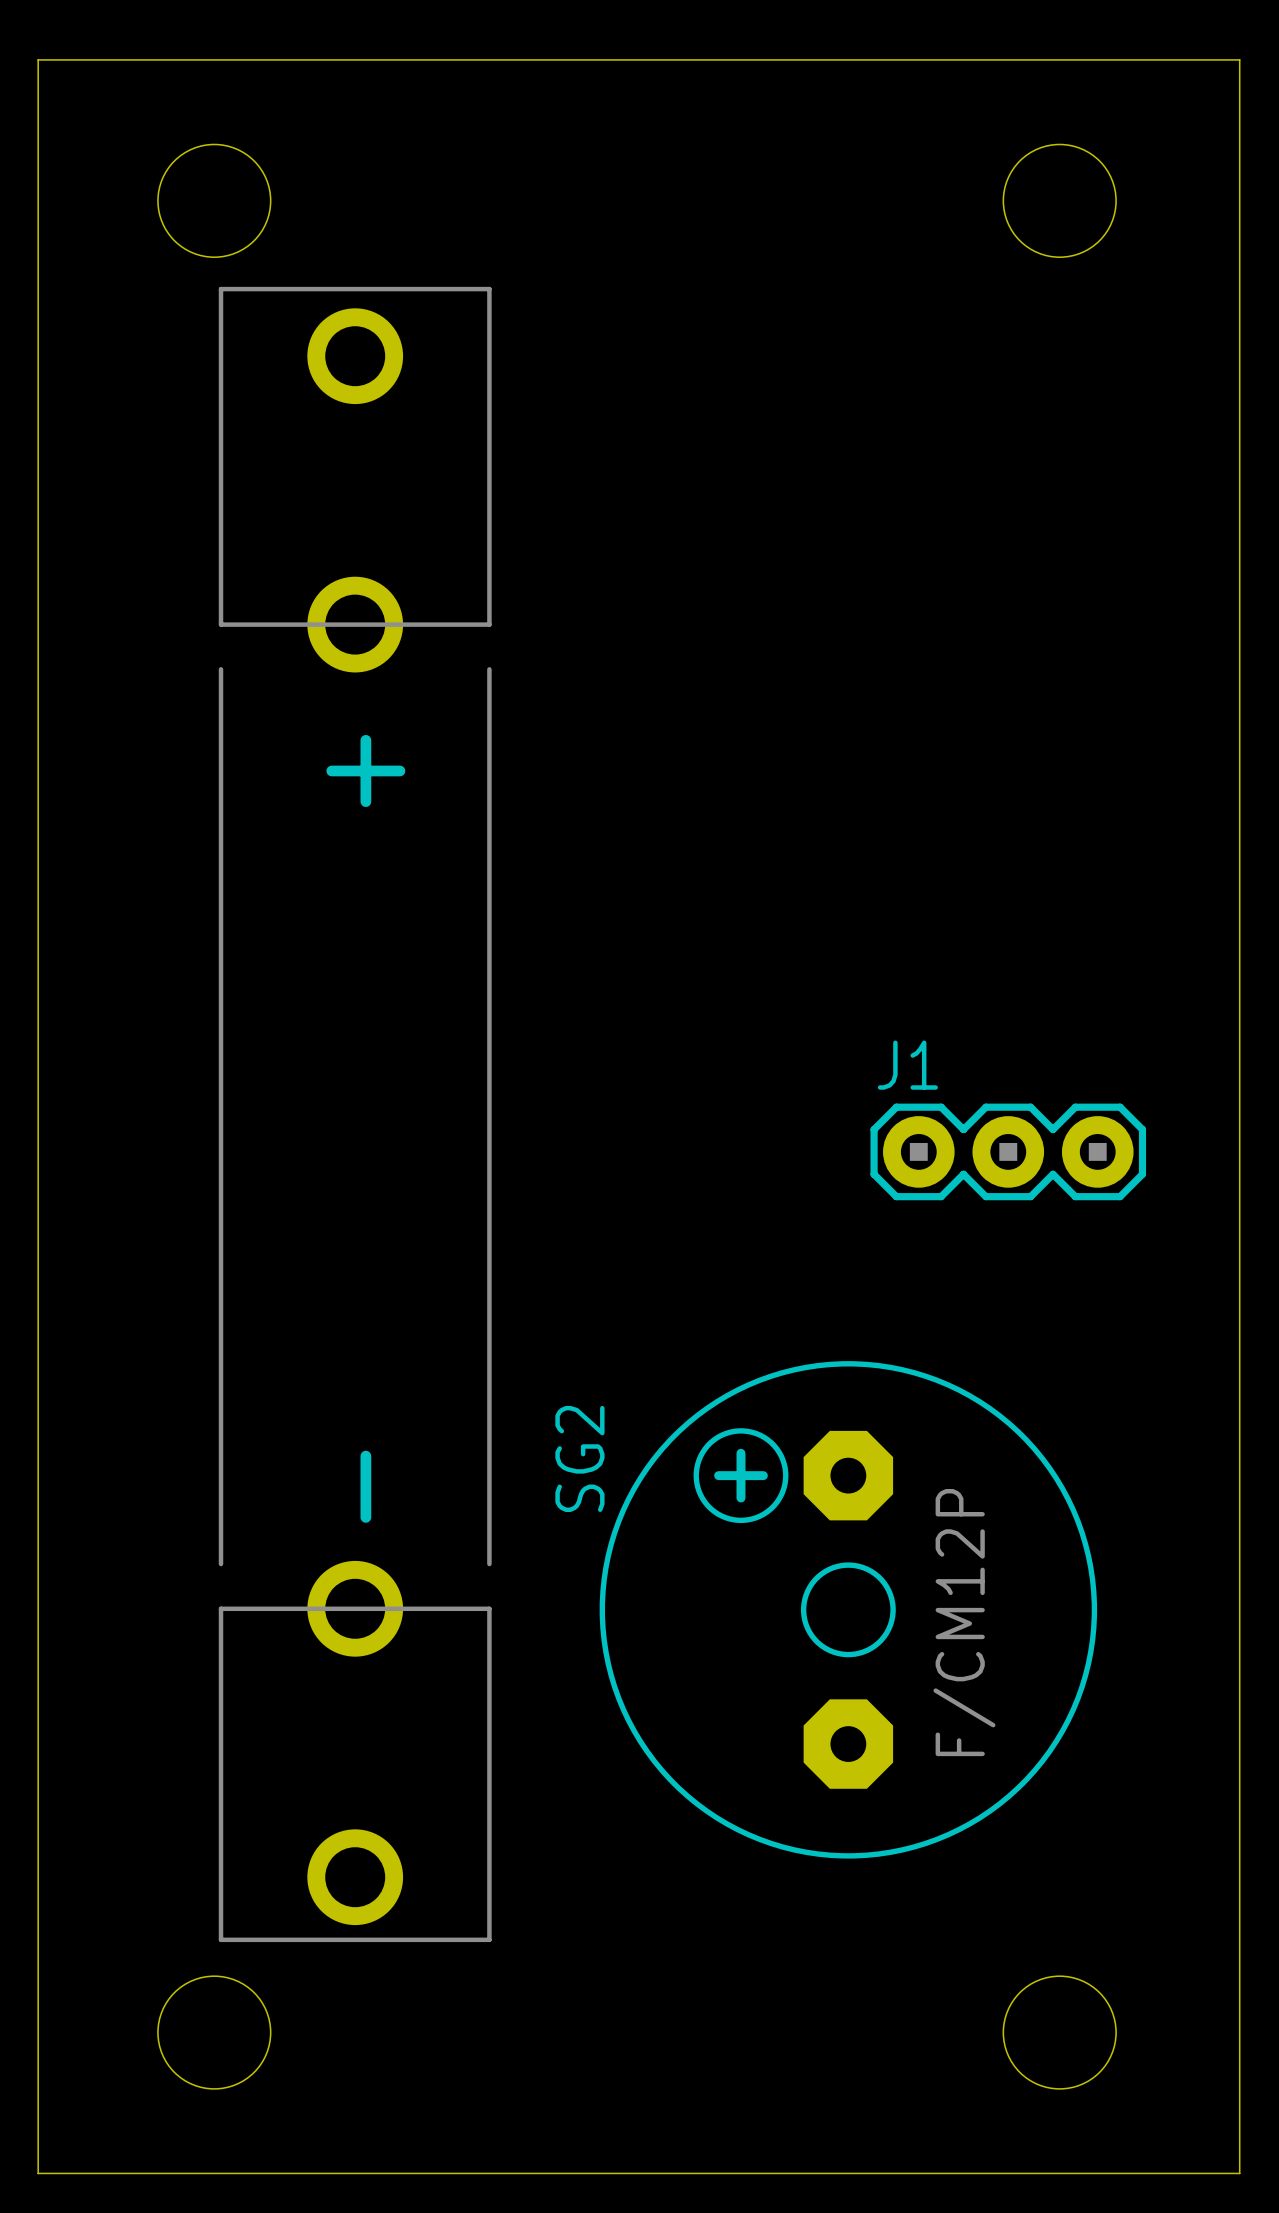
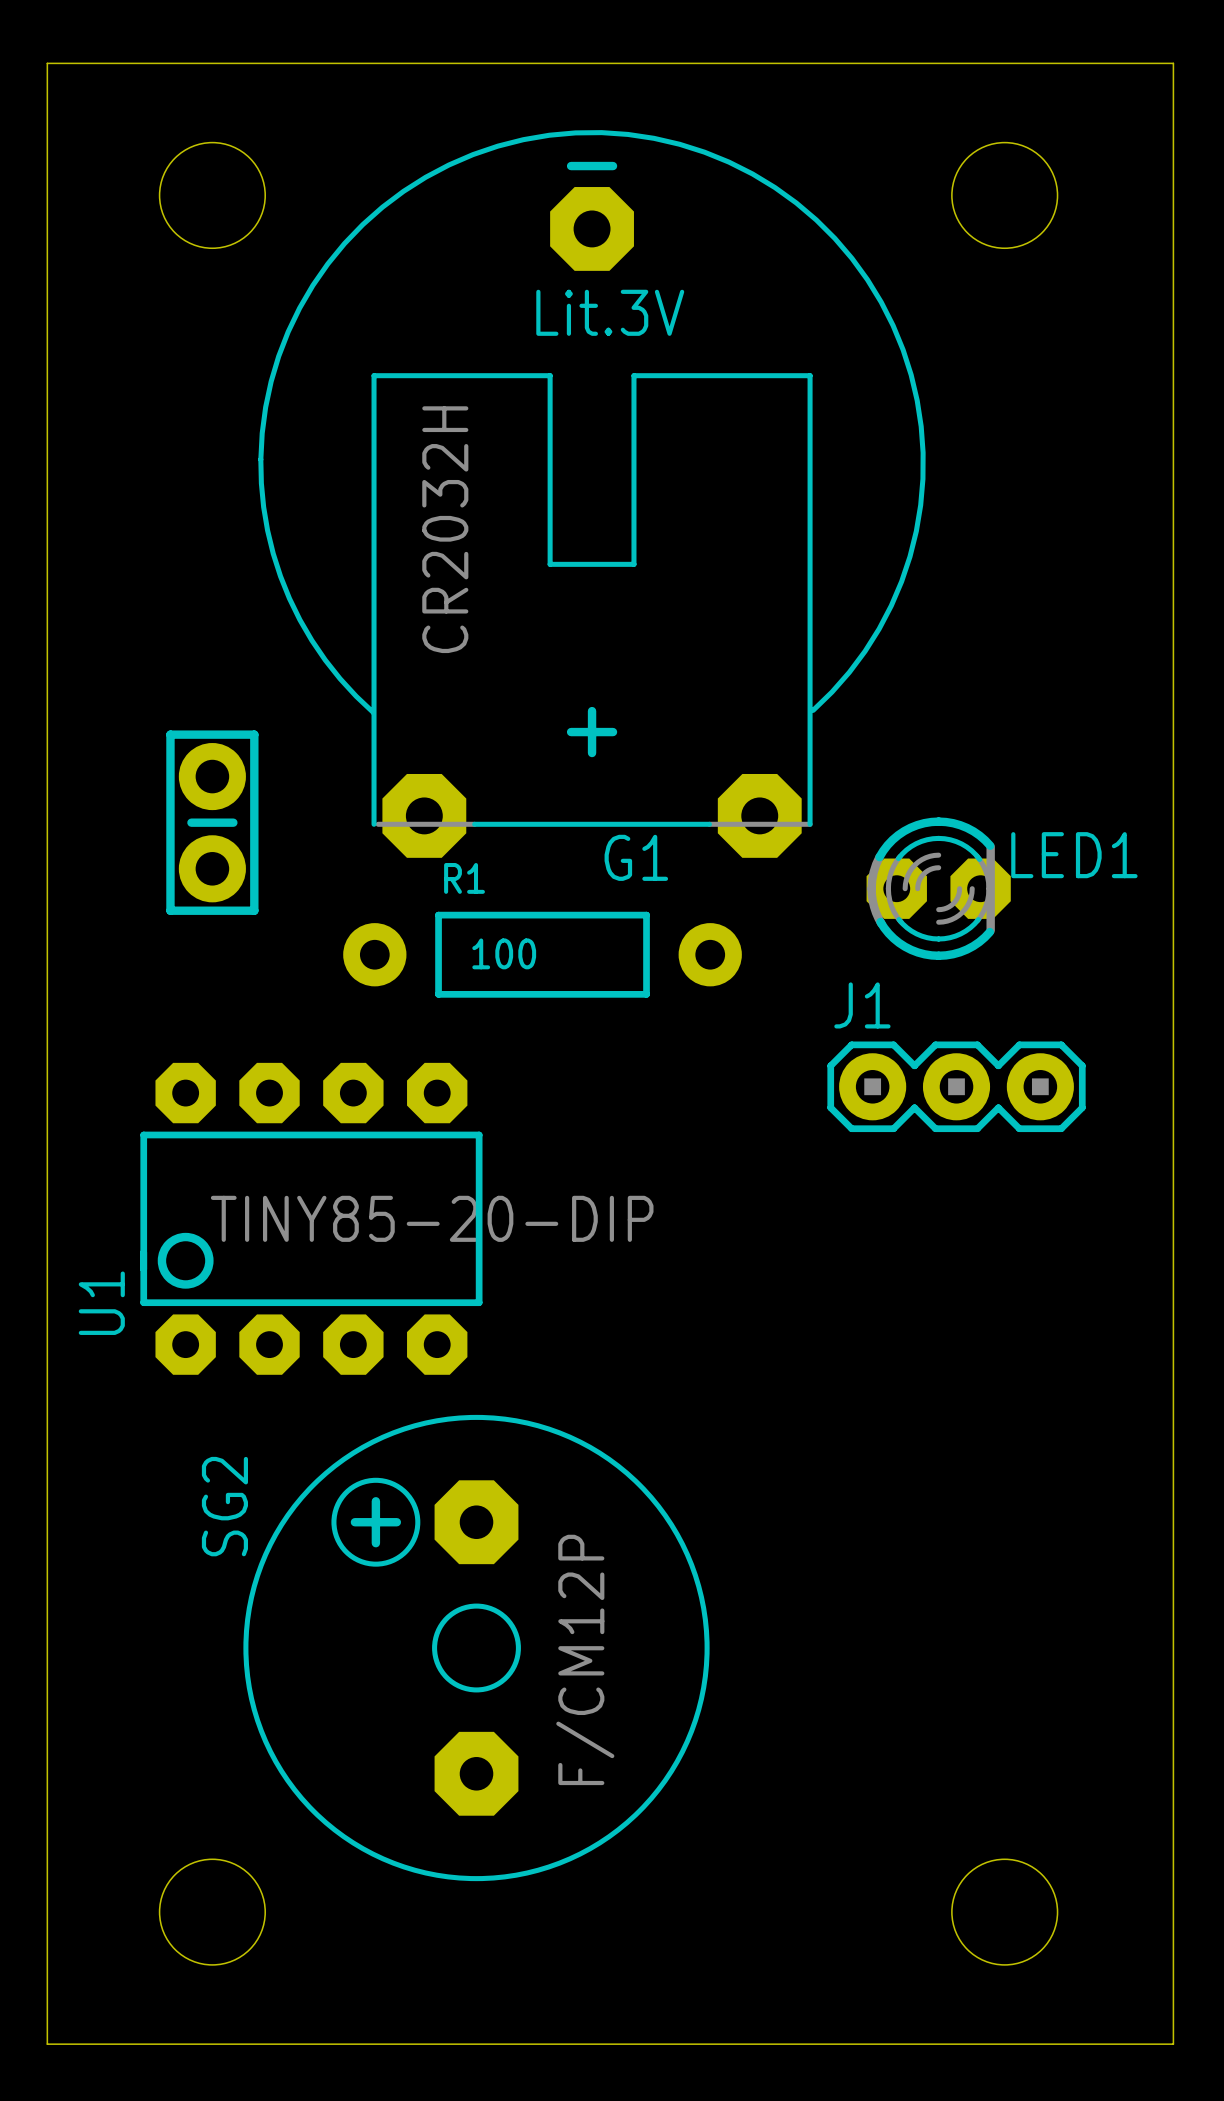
G1: none -> CR2032H (591, 493)
part: none -> (212, 822)
LED1: none -> (938, 888)
R1: none -> 100 (542, 954)
part: (355, 1114) -> none
U1: none -> TINY85-20-DIP (311, 1218)
SG2 position: (848, 1609) -> (476, 1648)

